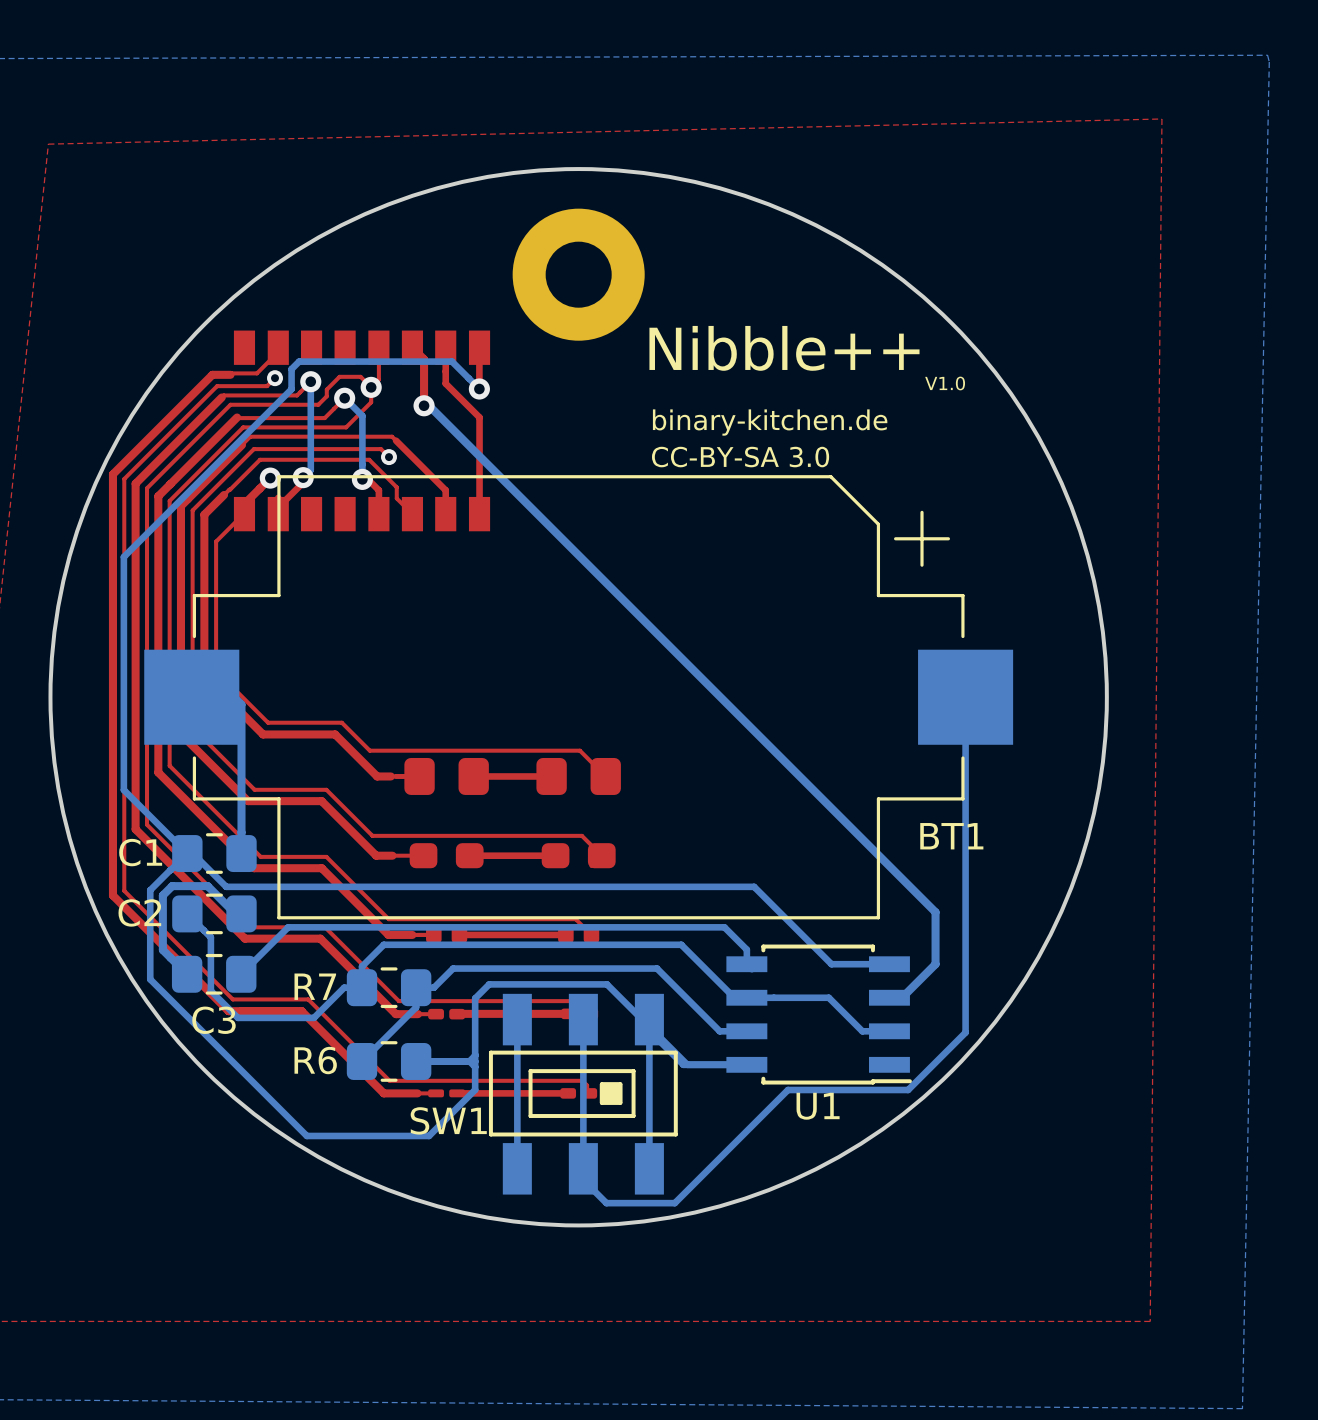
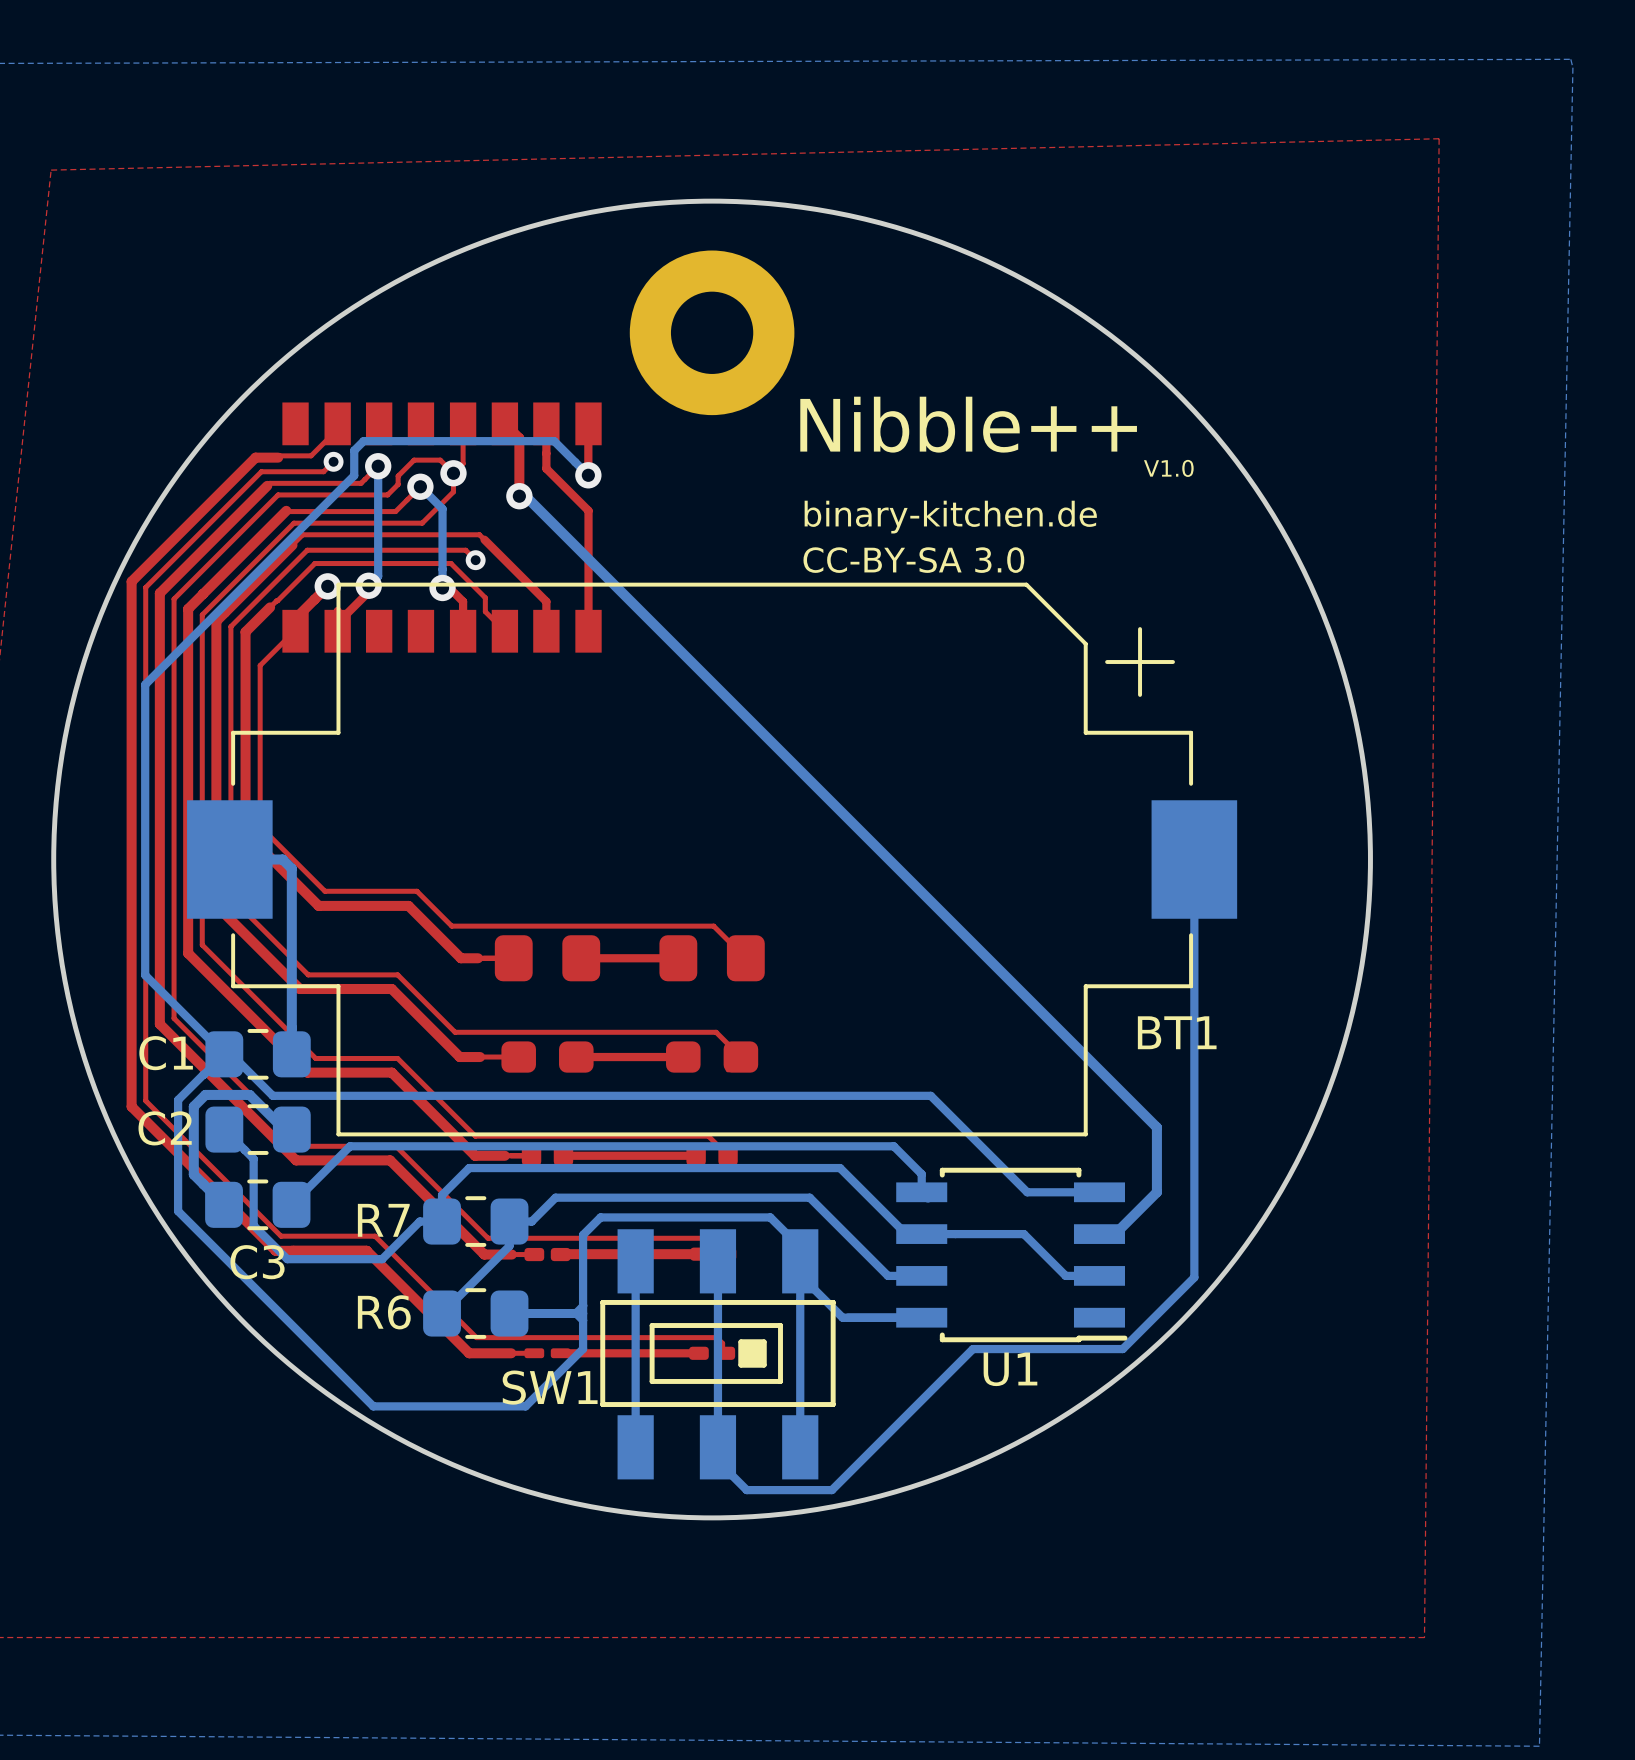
BT1 footprint: [144, 475, 1014, 920] -> [187, 582, 1238, 1137]
bottom track: (607, 984) (687, 1064) -> (747, 1217) (770, 1217) (800, 1247) (800, 1261)

